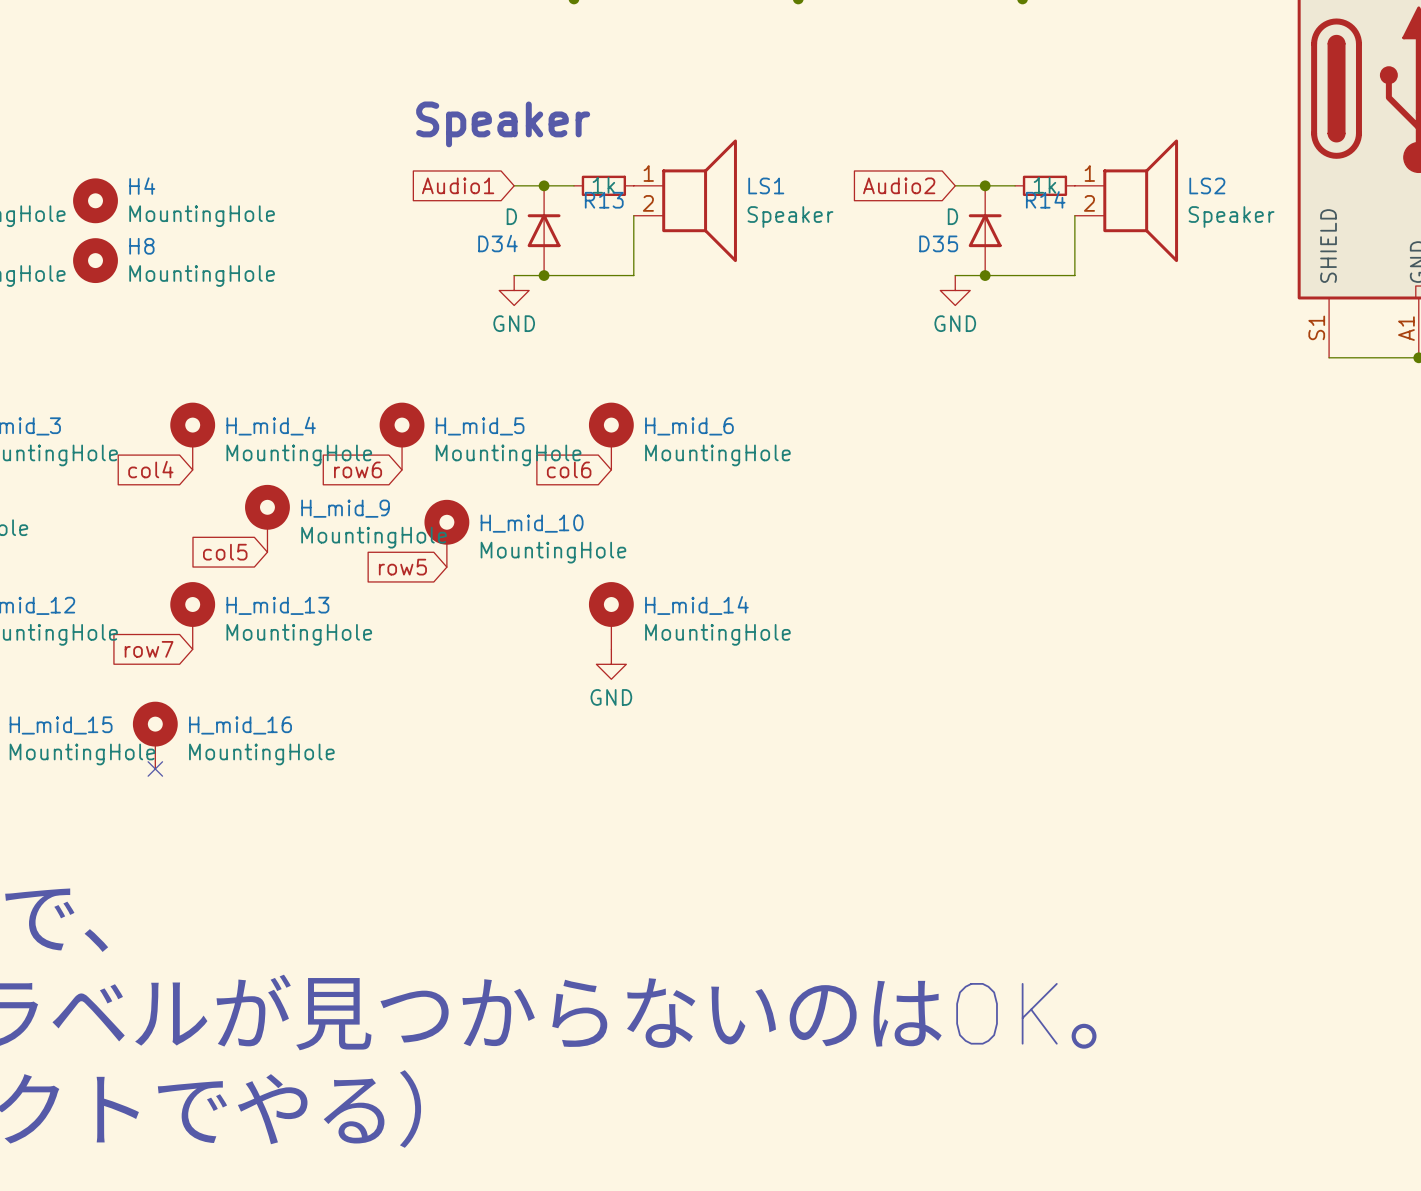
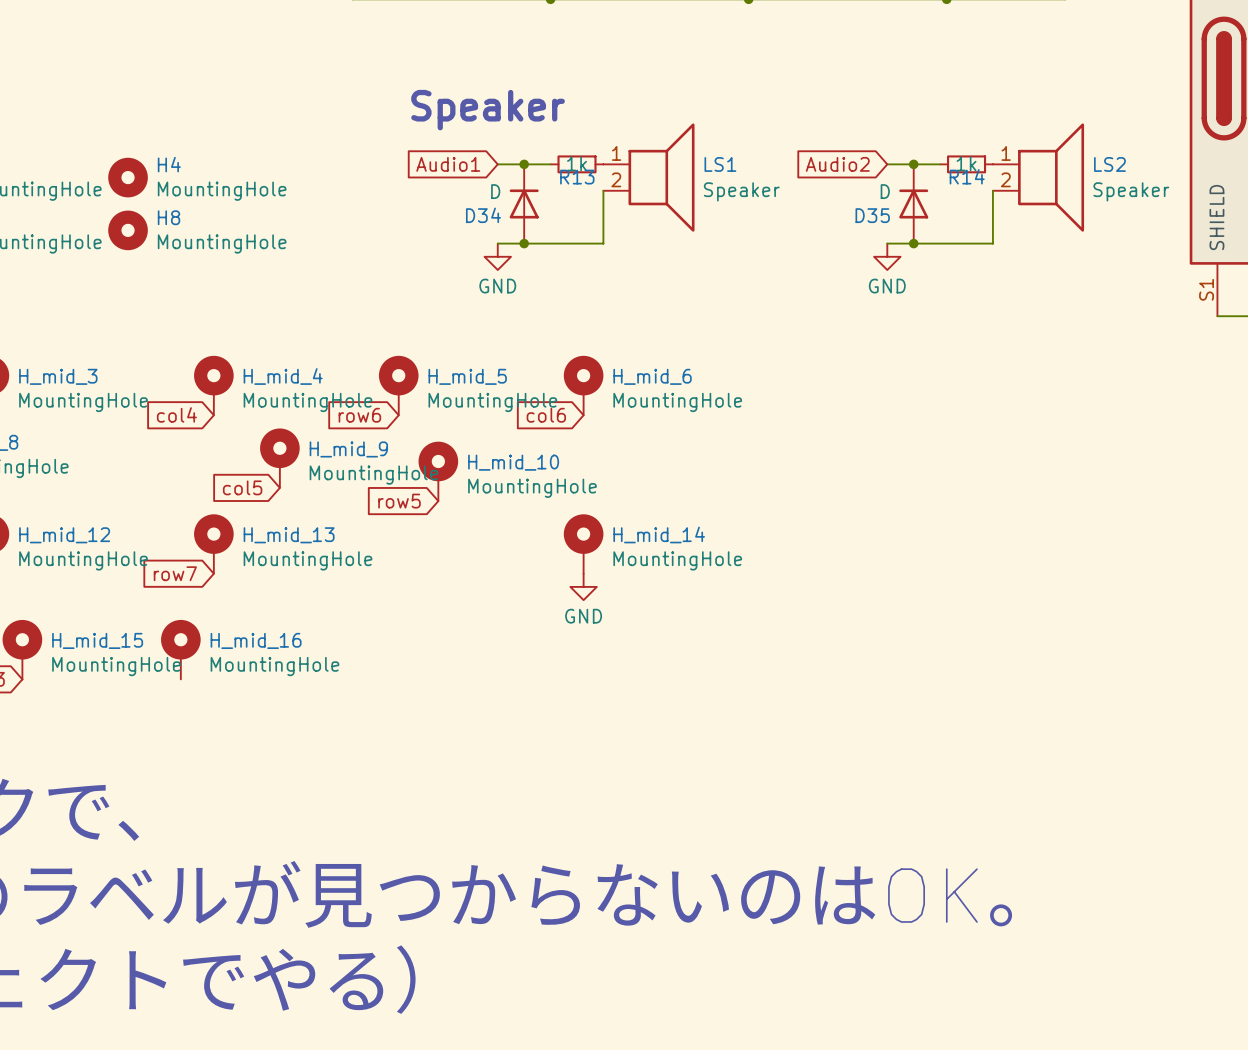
no-connect mark: (155, 768) -> none

